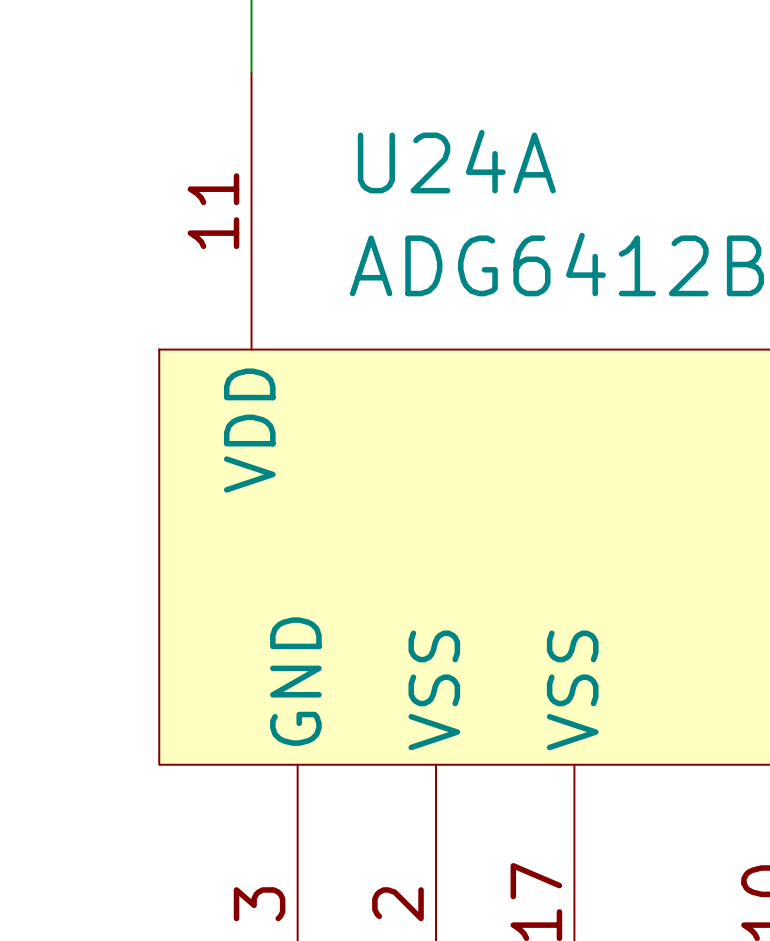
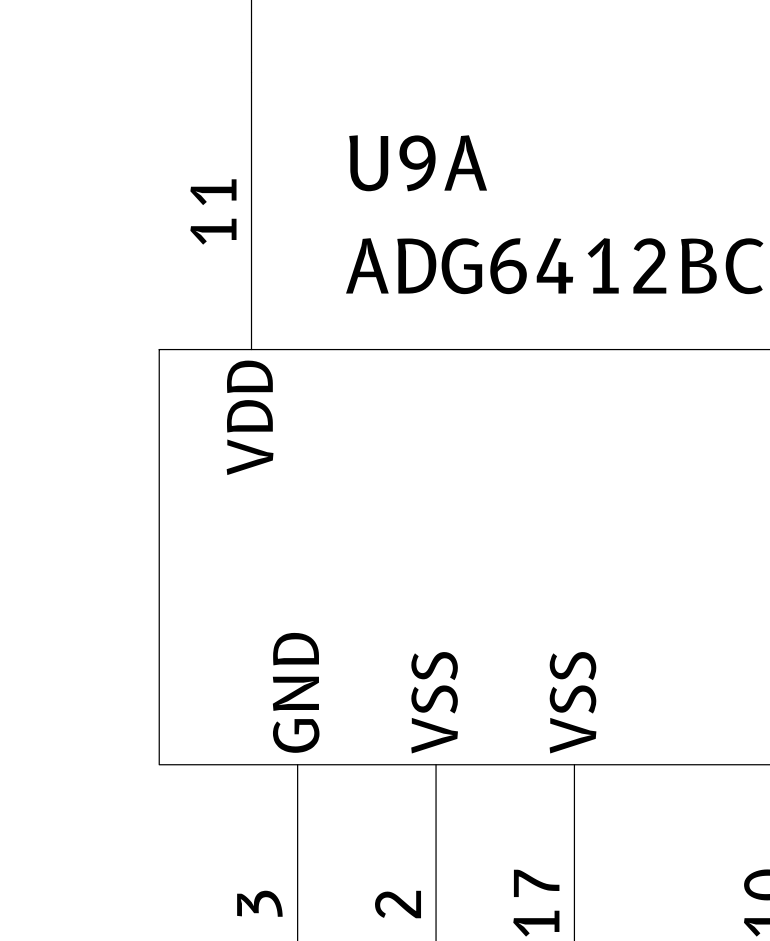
U24A name: U24A (456, 161) -> U9A (418, 163)

